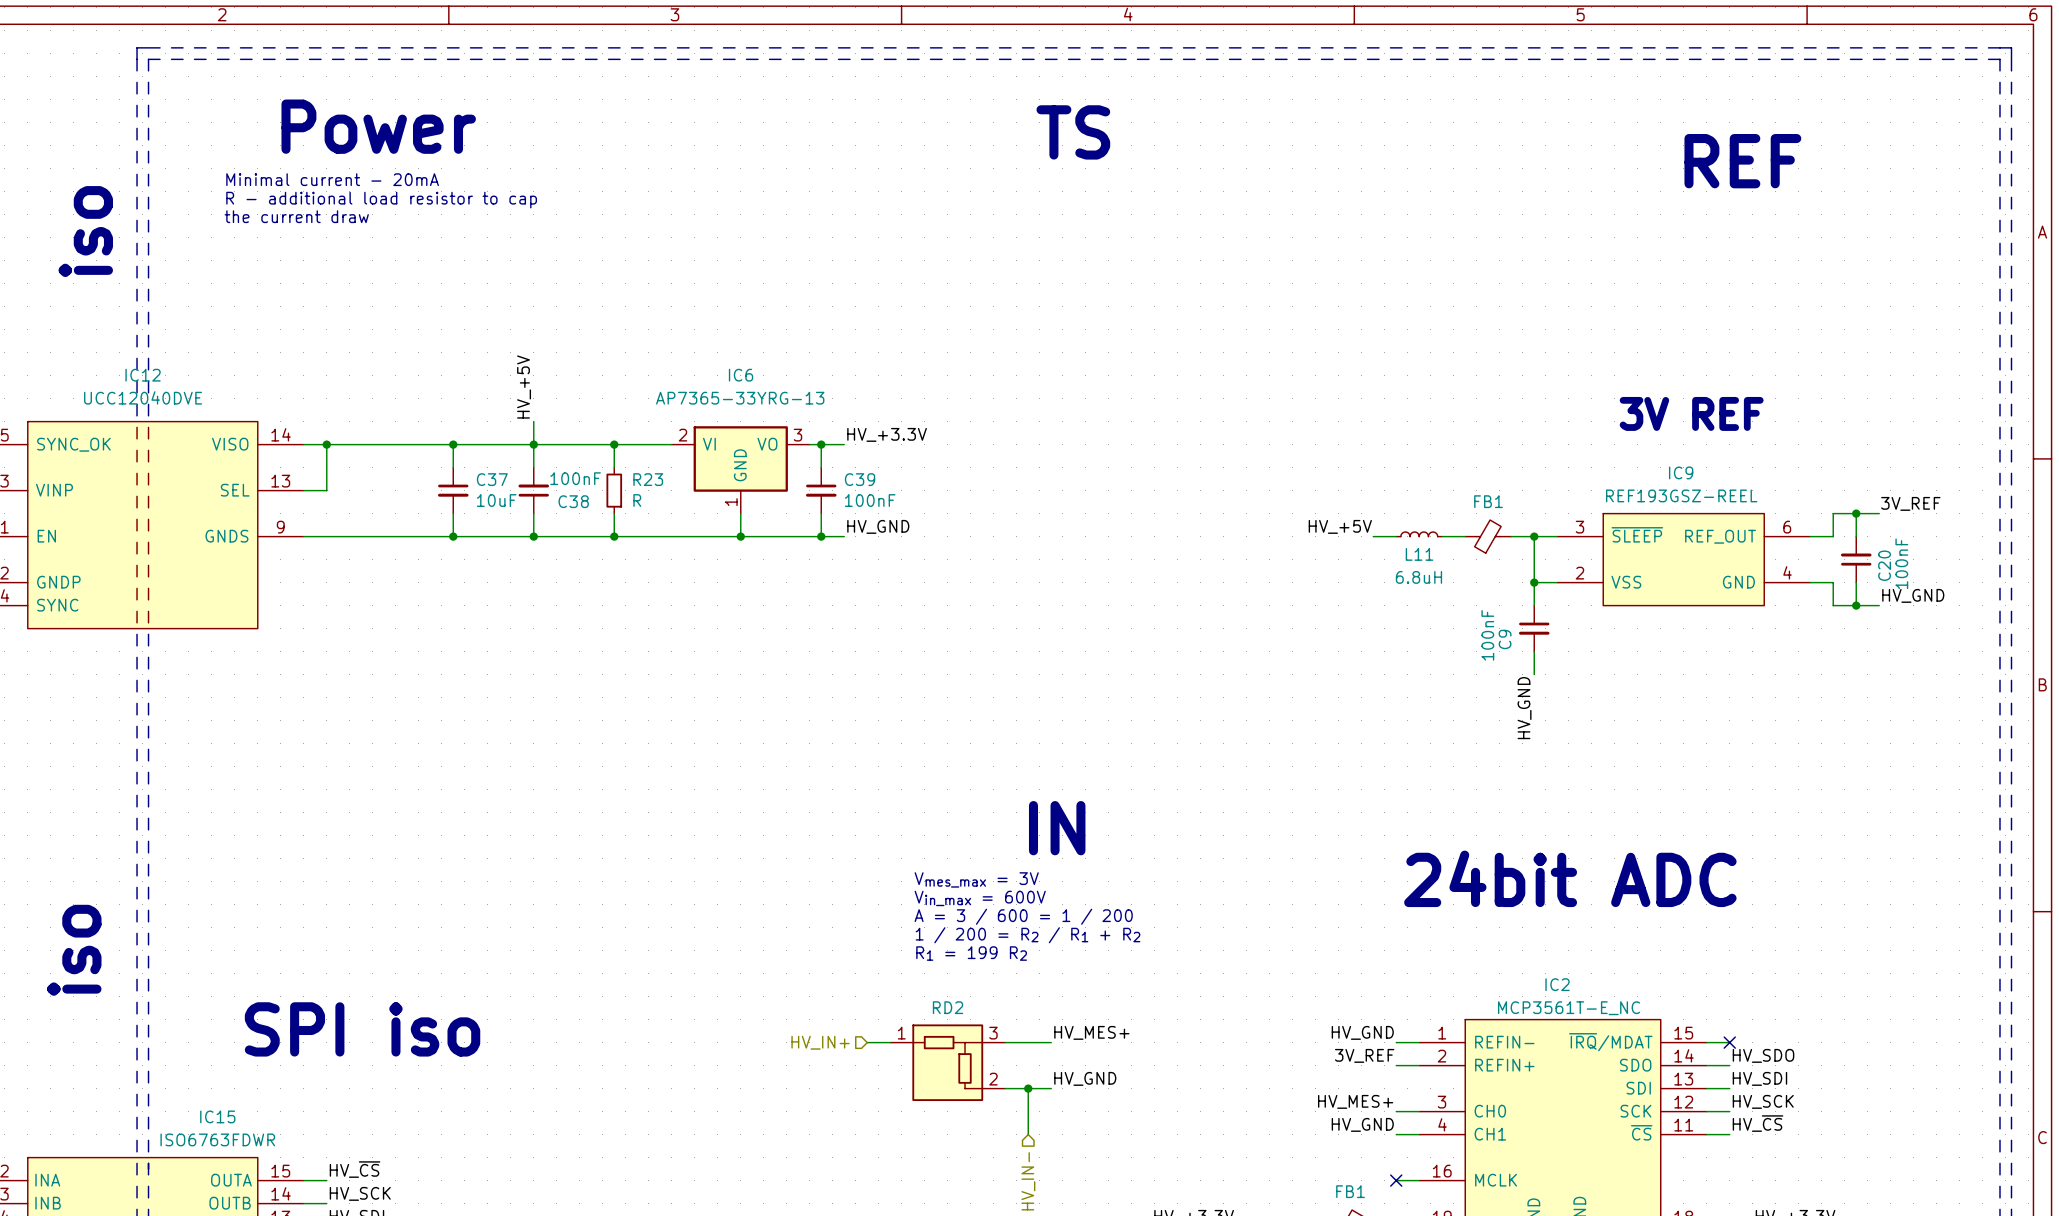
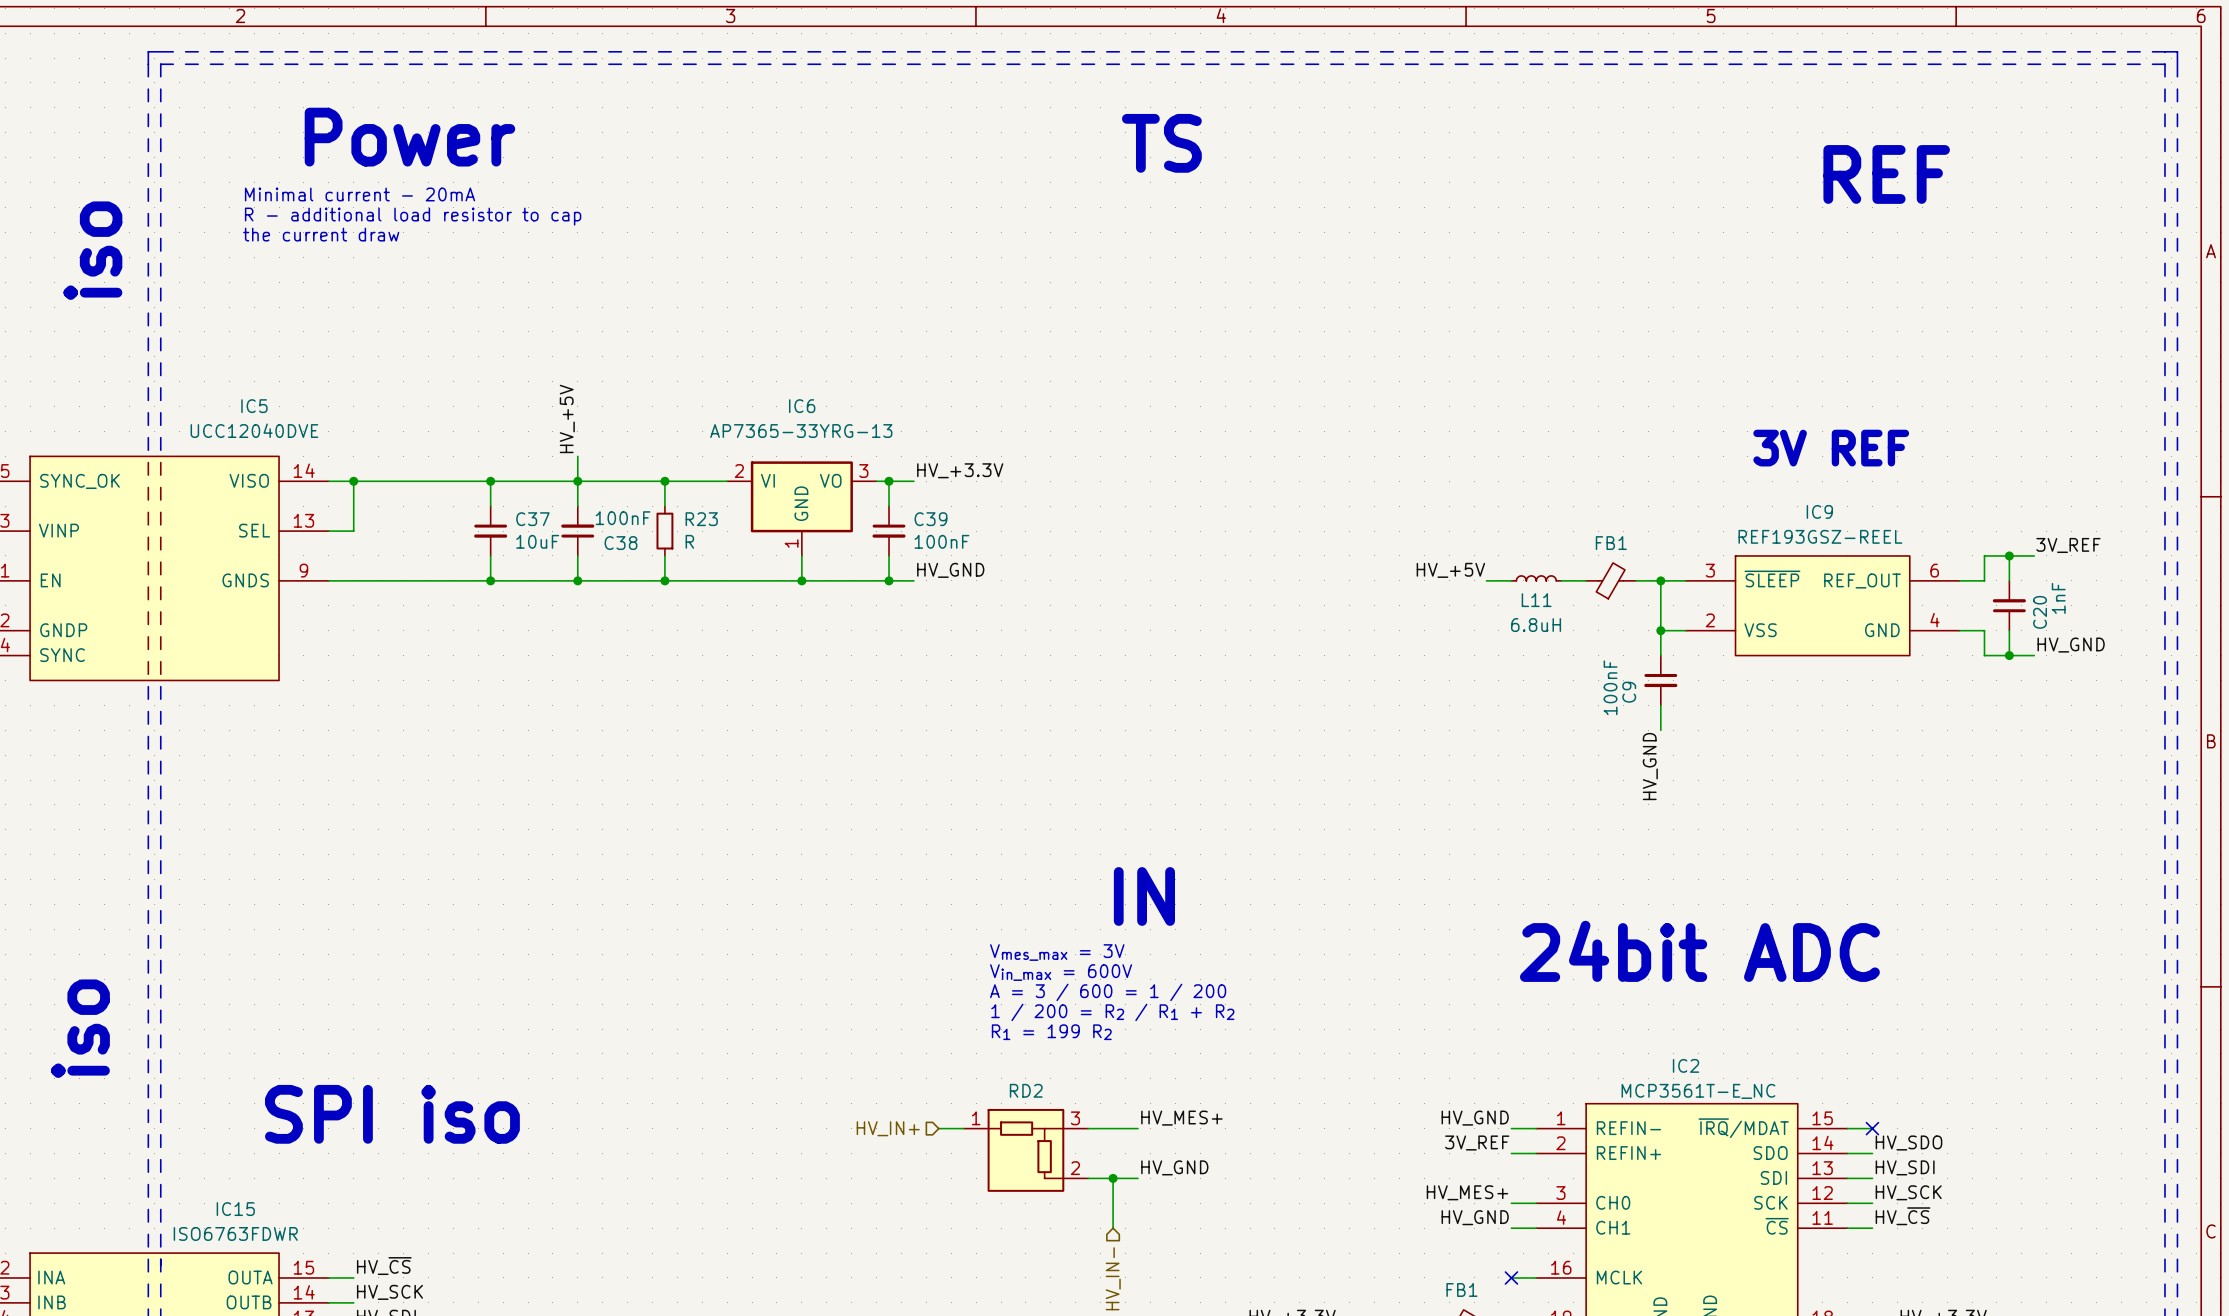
IC12 name: IC12 (143, 375) -> IC5 (254, 406)
IC12 value position: UCC12040DVE (143, 397) -> UCC12040DVE (254, 430)
C20 value: 100nF (1901, 563) -> 1nF (2058, 598)

